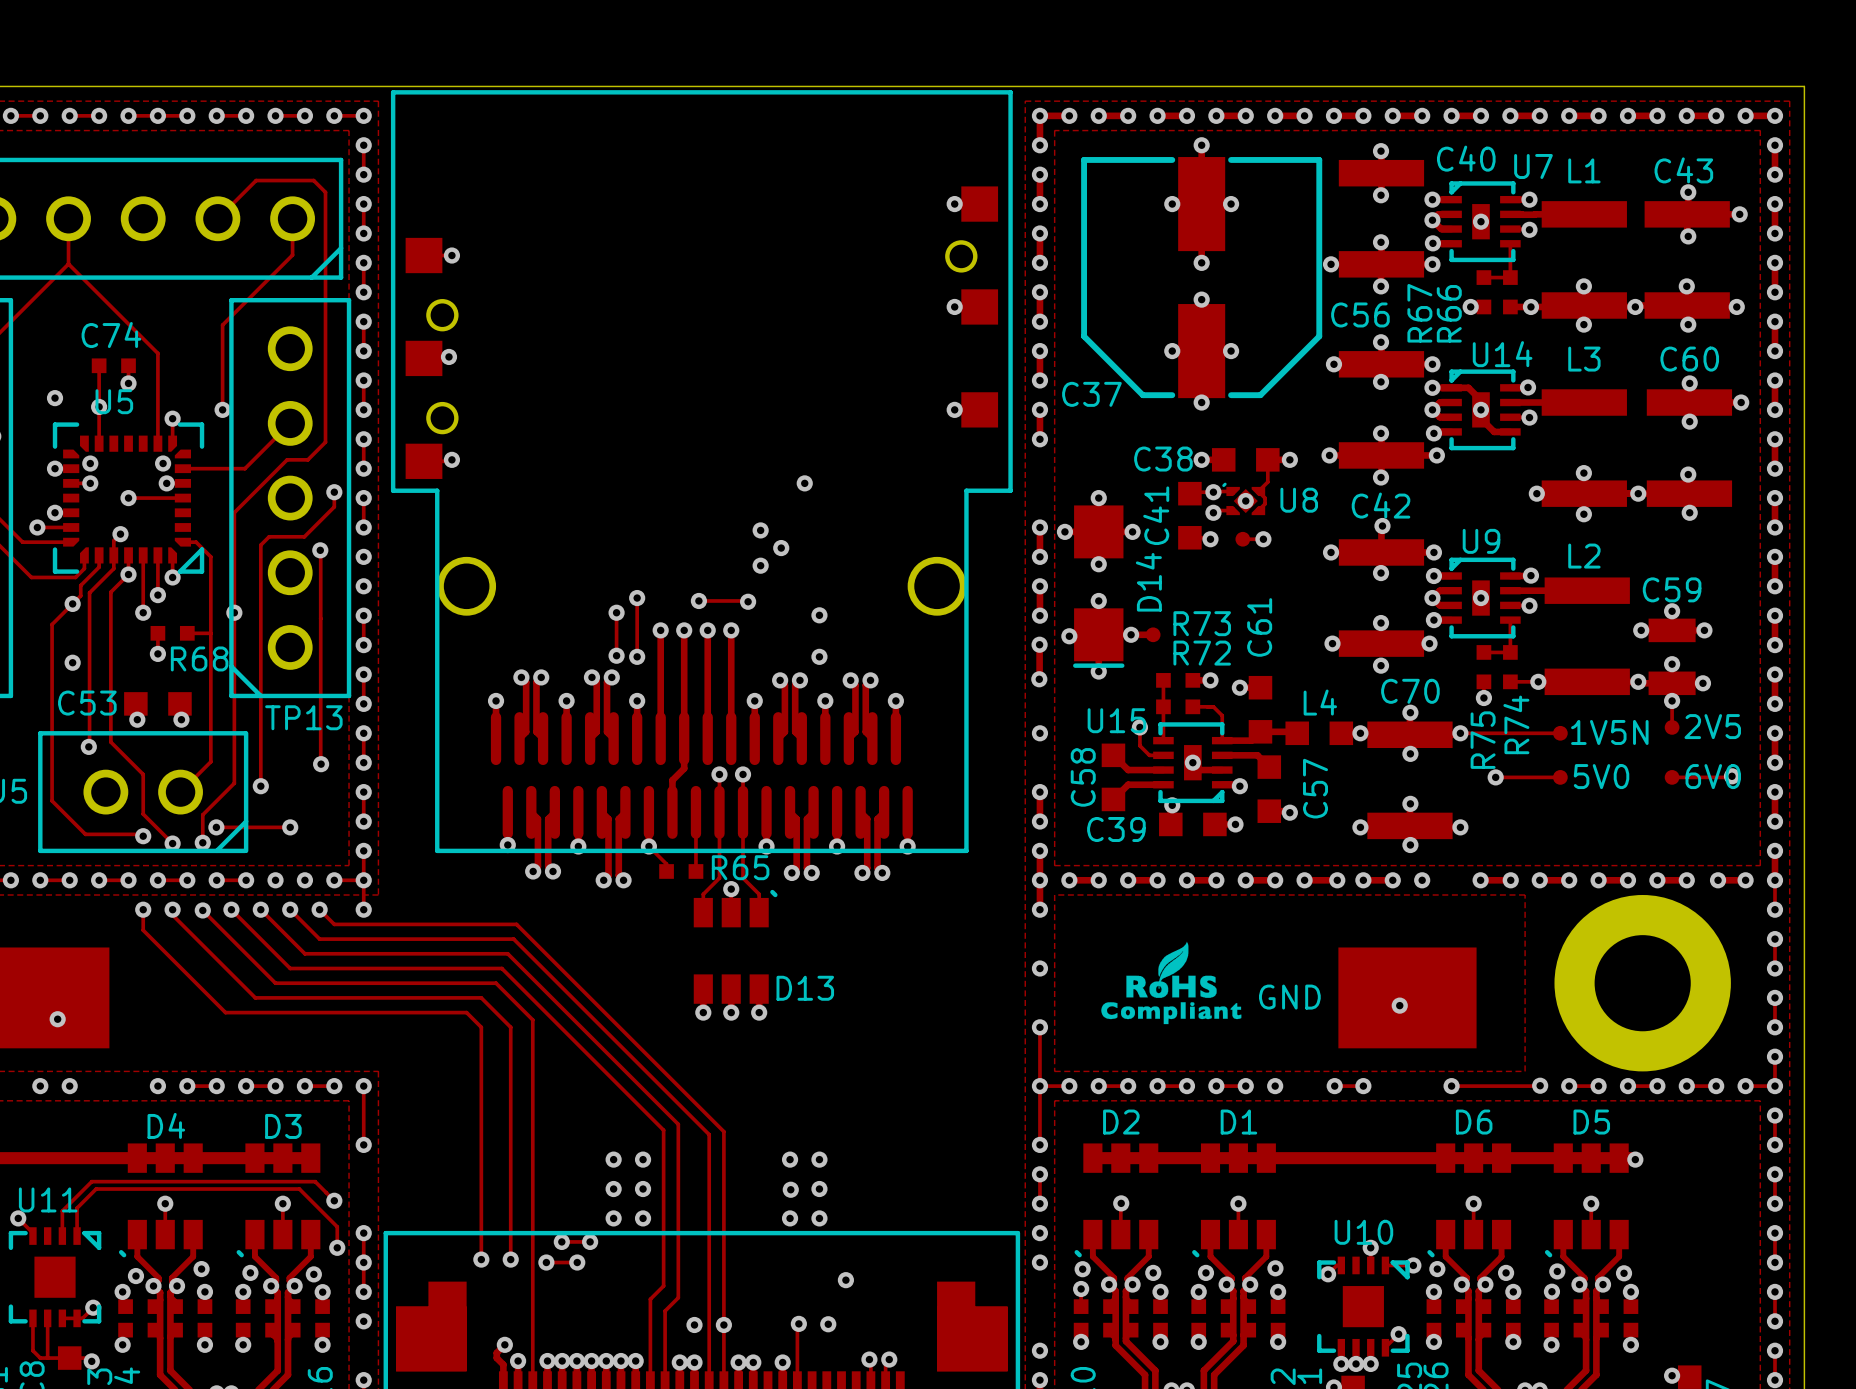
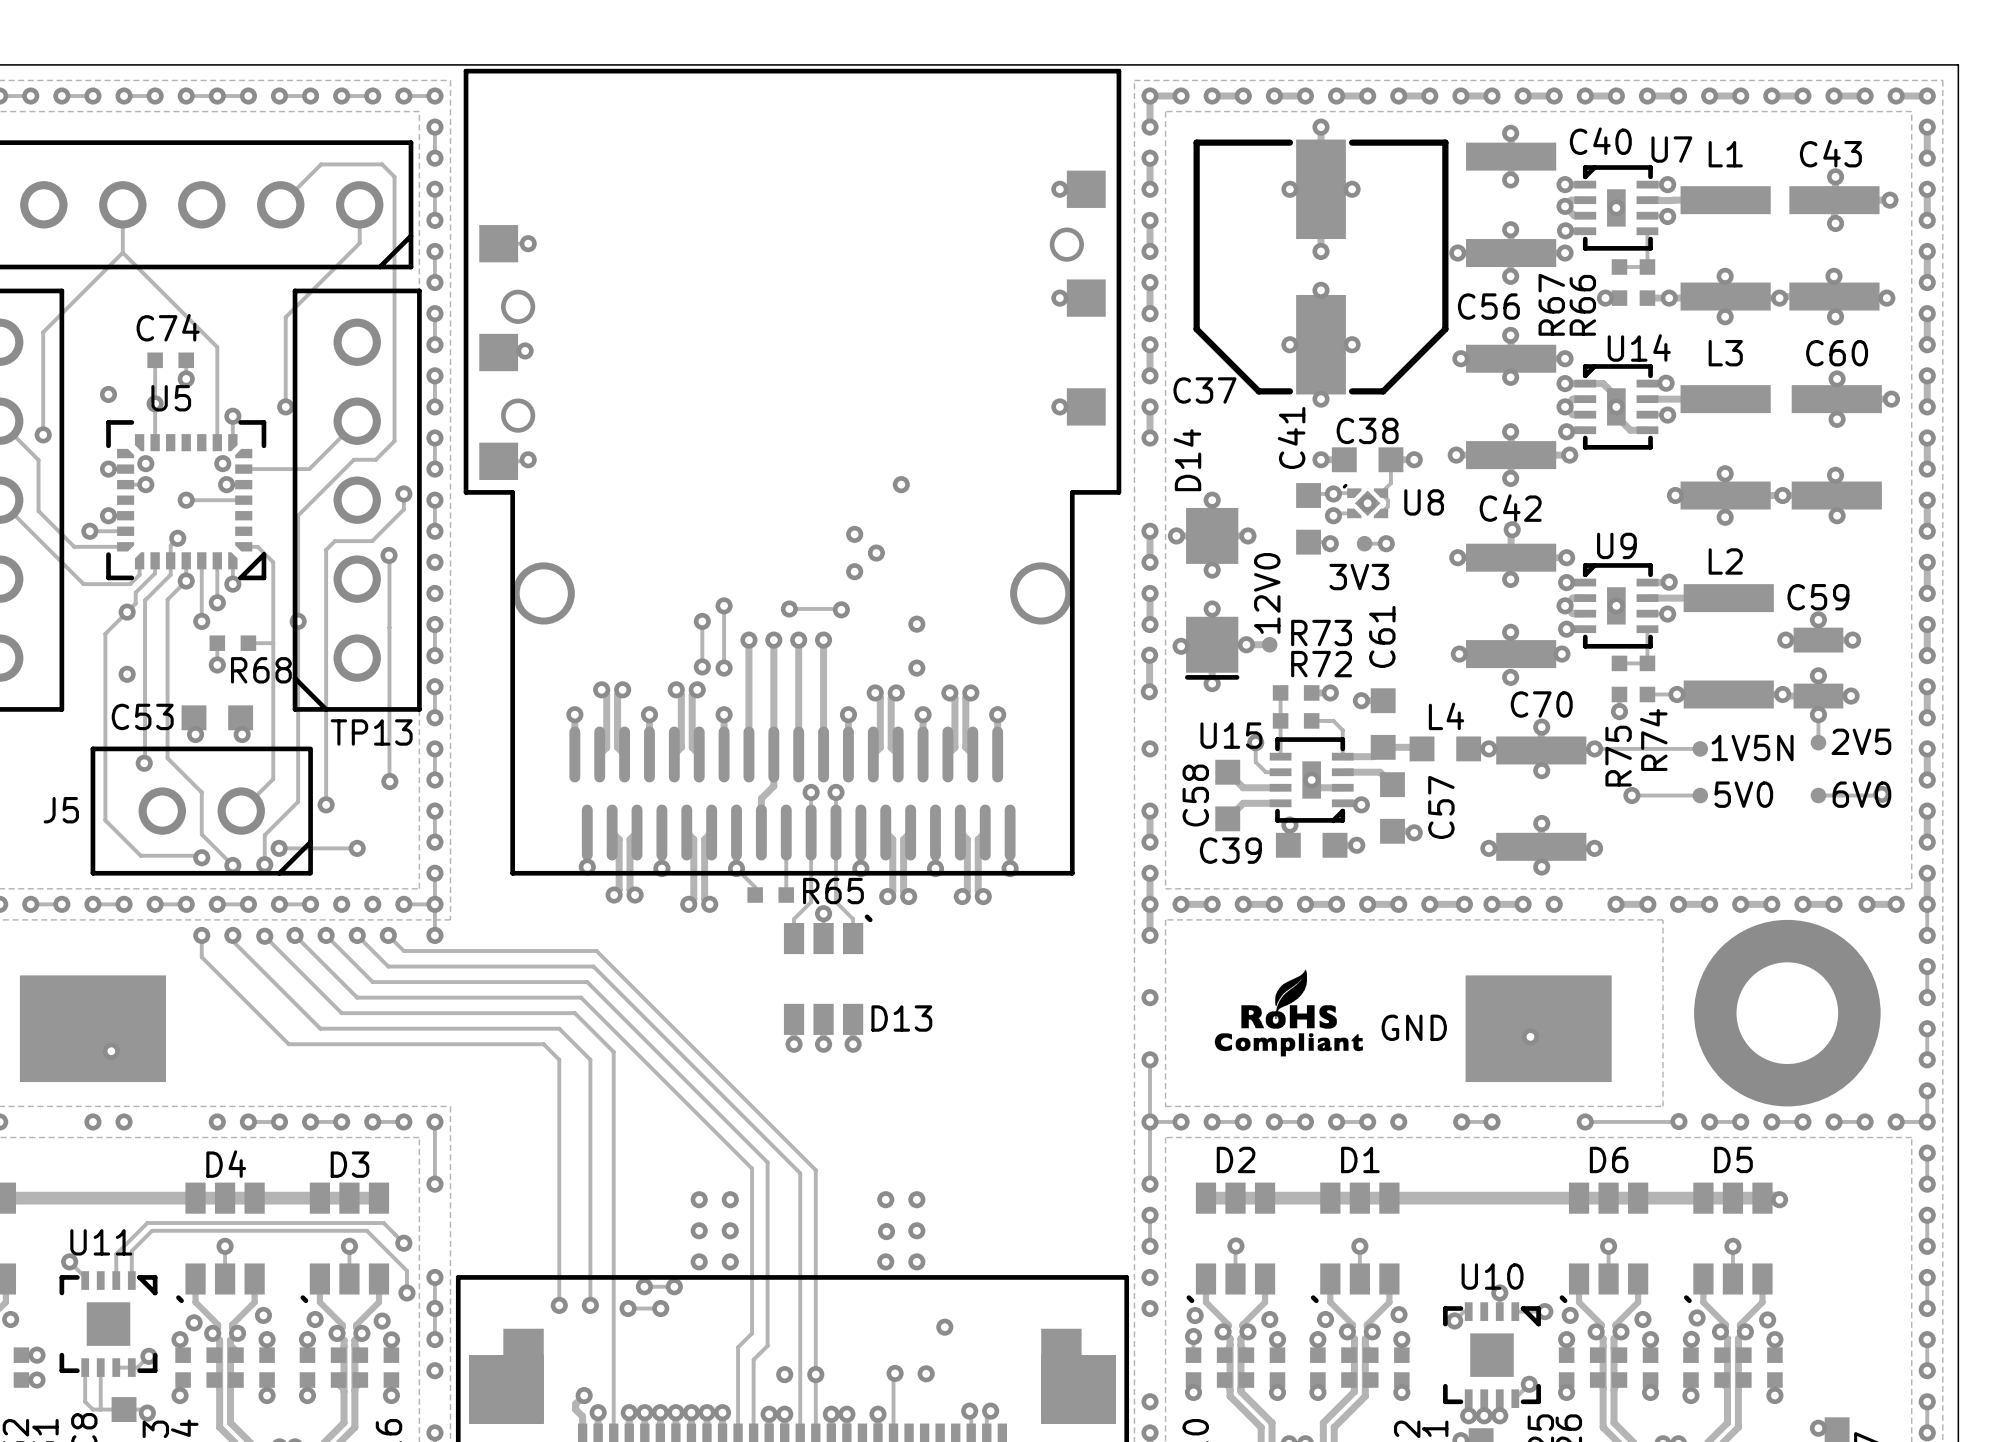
C38 name position: C38 (1163, 459) -> C38 (1367, 430)
C41 name position: C41 (1156, 515) -> C41 (1291, 438)
text: none -> 3V3 (1359, 577)
D14 name position: D14 (1148, 582) -> D14 (1187, 460)
text: none -> 12V0 (1267, 593)

